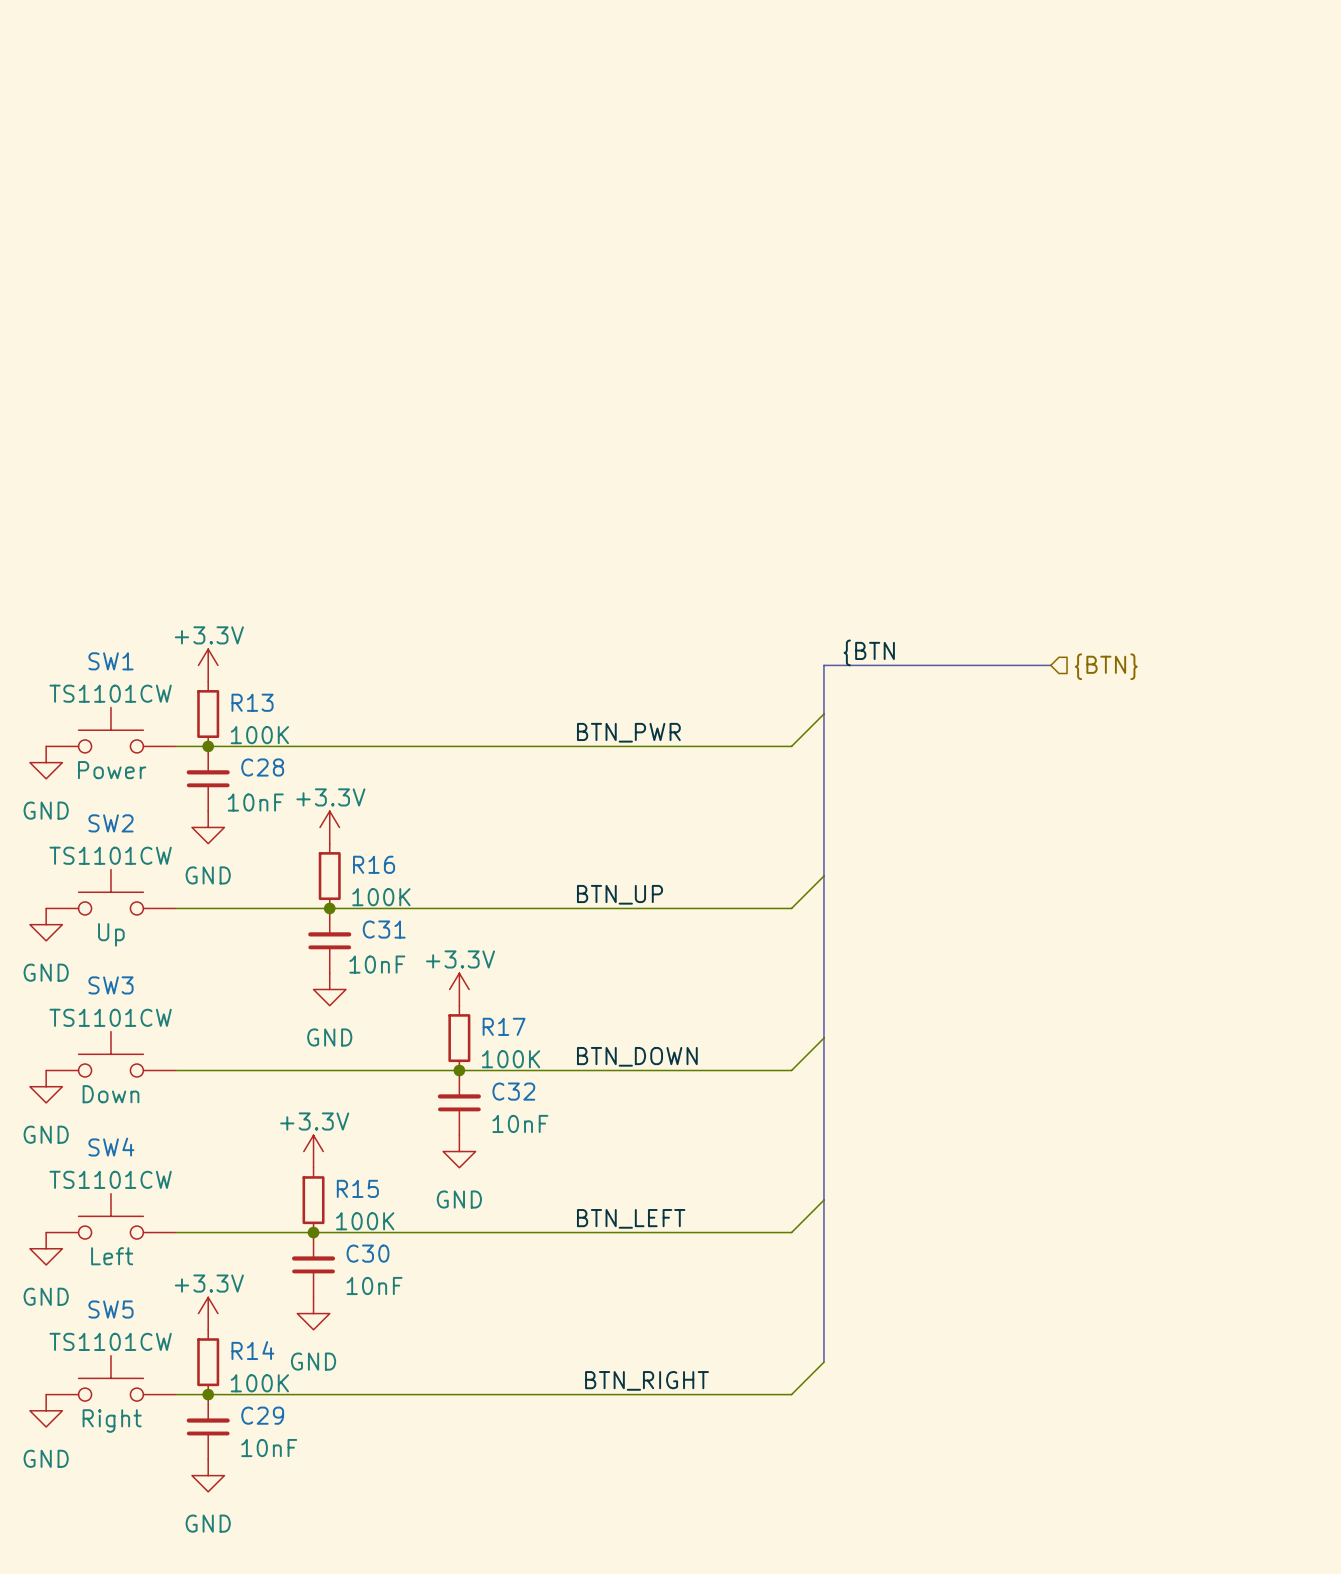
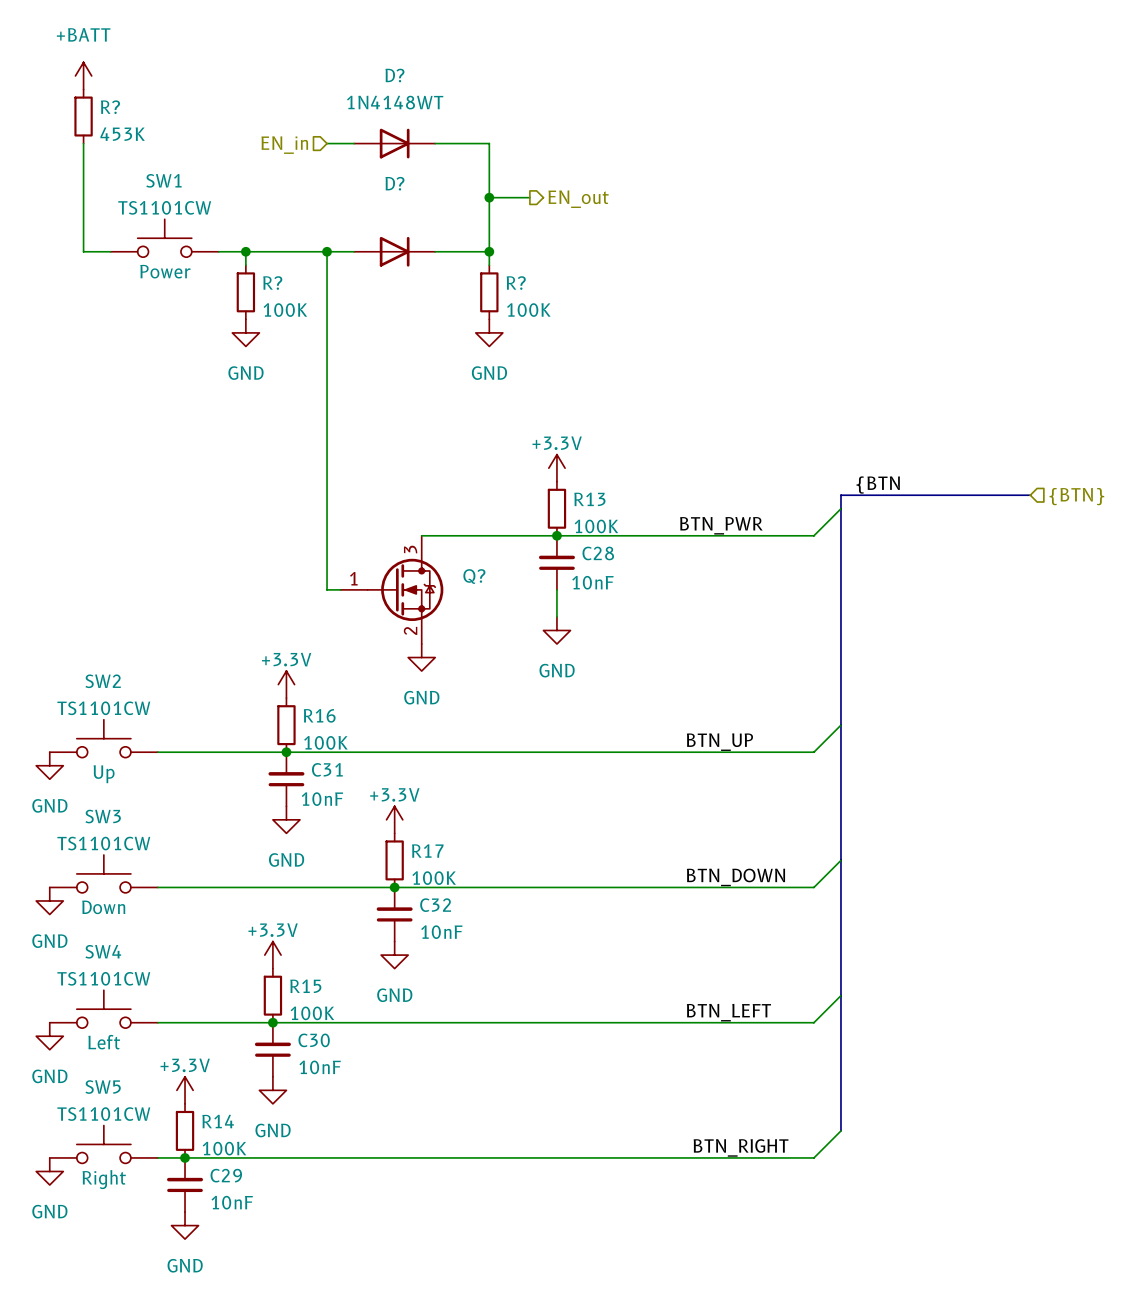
power symbol: none -> +BATT (83, 75)
R?: none -> 453K (83, 116)
wire: none -> (83, 143) (83, 251) (110, 251)
hierarchical label: none -> EN_in (284, 145)
wire: none -> (327, 143) (354, 143)
D?: none -> 1N4148WT (394, 143)
wire: none -> (435, 143) (489, 143) (489, 265)
wire: none -> (489, 197) (529, 197)
junction: none -> (489, 197)
hierarchical label: none -> EN_out (578, 199)
wire: none -> (218, 251) (354, 251)
wire: none -> (245, 251) (245, 265)
junction: none -> (245, 251)
wire: none -> (327, 251) (327, 589) (340, 589)
junction: none -> (327, 251)
D?: none -> (394, 251)
wire: none -> (435, 251) (489, 251)
junction: none -> (489, 251)
R?: none -> 100K (245, 292)
R?: none -> 100K (489, 292)
power symbol: none -> GND (245, 332)
power symbol: none -> GND (489, 332)
power symbol: none -> +3.3V (556, 468)
bus: none -> (1030, 495) (840, 495) (840, 1130)
wire: none -> (840, 508) (813, 535) (421, 535)
junction: none -> (556, 535)
label position: {BTN (869, 652) -> {BTN (878, 485)
power symbol: +3.3V (208, 665) -> none
bus: (1050, 665) (823, 665) (823, 1362) -> none
hierarchical label position: {BTN} (1106, 666) -> {BTN} (1076, 496)
R13 position: (208, 714) -> (556, 508)
Q?: none -> (391, 589)
wire: none -> (556, 589) (556, 616)
wire: (823, 714) (791, 746) (175, 746) -> none
SW1 position: (110, 730) -> (164, 238)
label position: BTN_PWR (628, 732) -> BTN_PWR (721, 525)
junction: (208, 746) -> none
power symbol: GND (46, 762) -> none
power symbol: none -> GND (556, 630)
C28 position: (208, 778) -> (556, 562)
power symbol: none -> GND (421, 657)
power symbol: GND (208, 827) -> none
wire: (823, 876) (791, 908) -> (840, 725) (813, 752) (671, 752)
label position: BTN_UP (620, 894) -> BTN_UP (719, 742)
wire: (823, 1038) (791, 1070) -> (840, 860) (813, 887) (671, 887)
label position: BTN_DOWN (637, 1056) -> BTN_DOWN (735, 877)
wire: (823, 1200) (791, 1232) -> (840, 995) (813, 1022) (671, 1022)
label position: BTN_LEFT (631, 1218) -> BTN_LEFT (728, 1012)
wire: (823, 1362) (791, 1394) -> (840, 1130) (813, 1157) (671, 1157)
label position: BTN_RIGHT (647, 1380) -> BTN_RIGHT (741, 1147)

